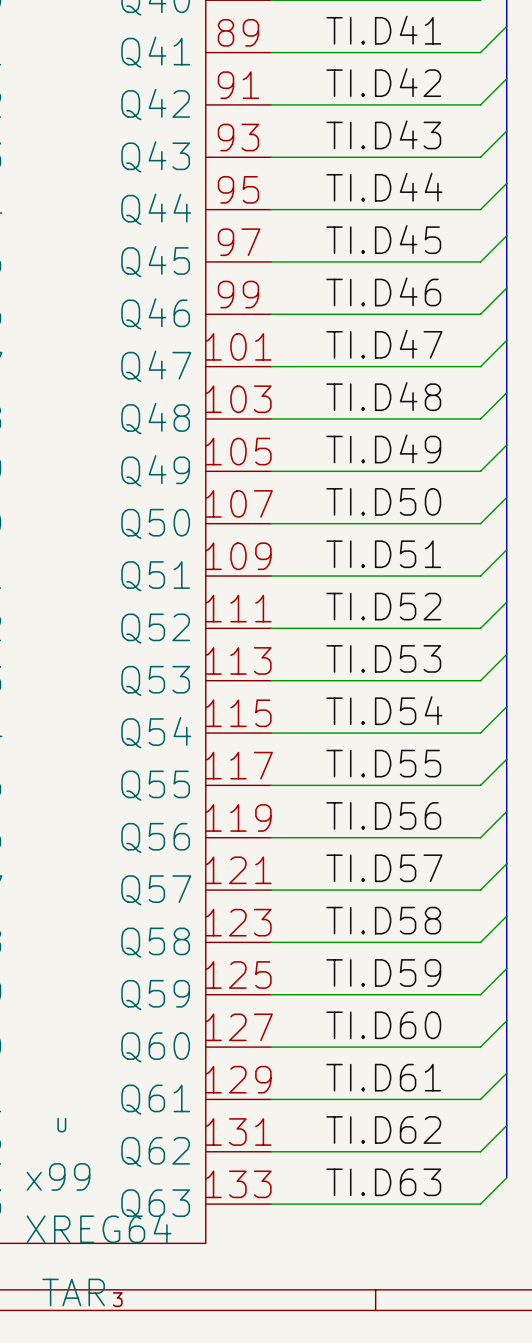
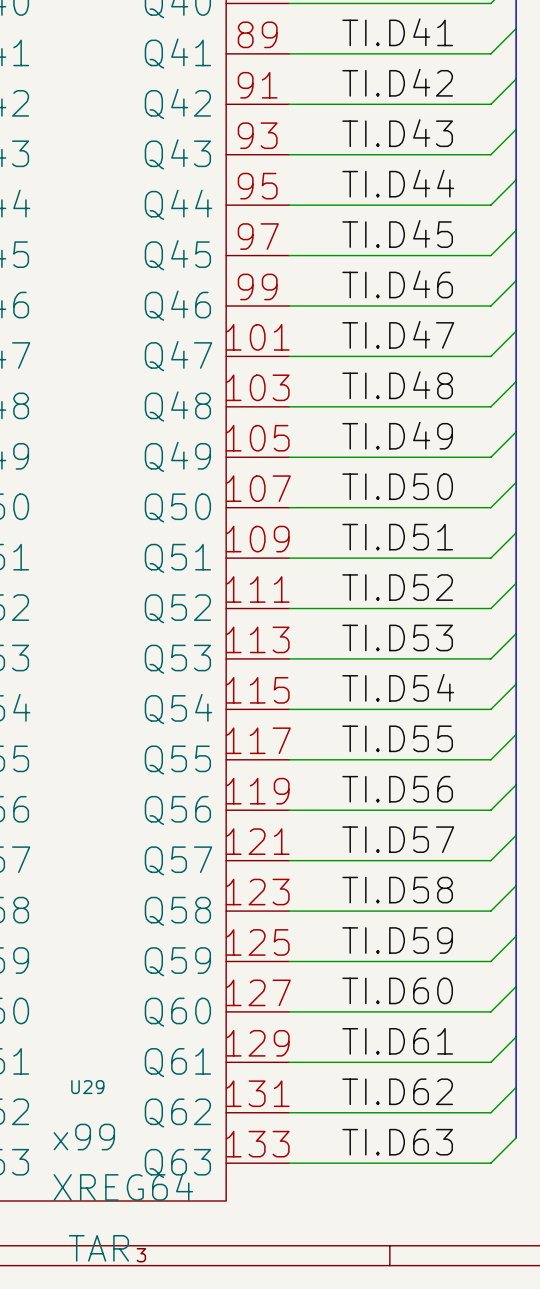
U name: U (61, 1125) -> U29 (87, 1087)

